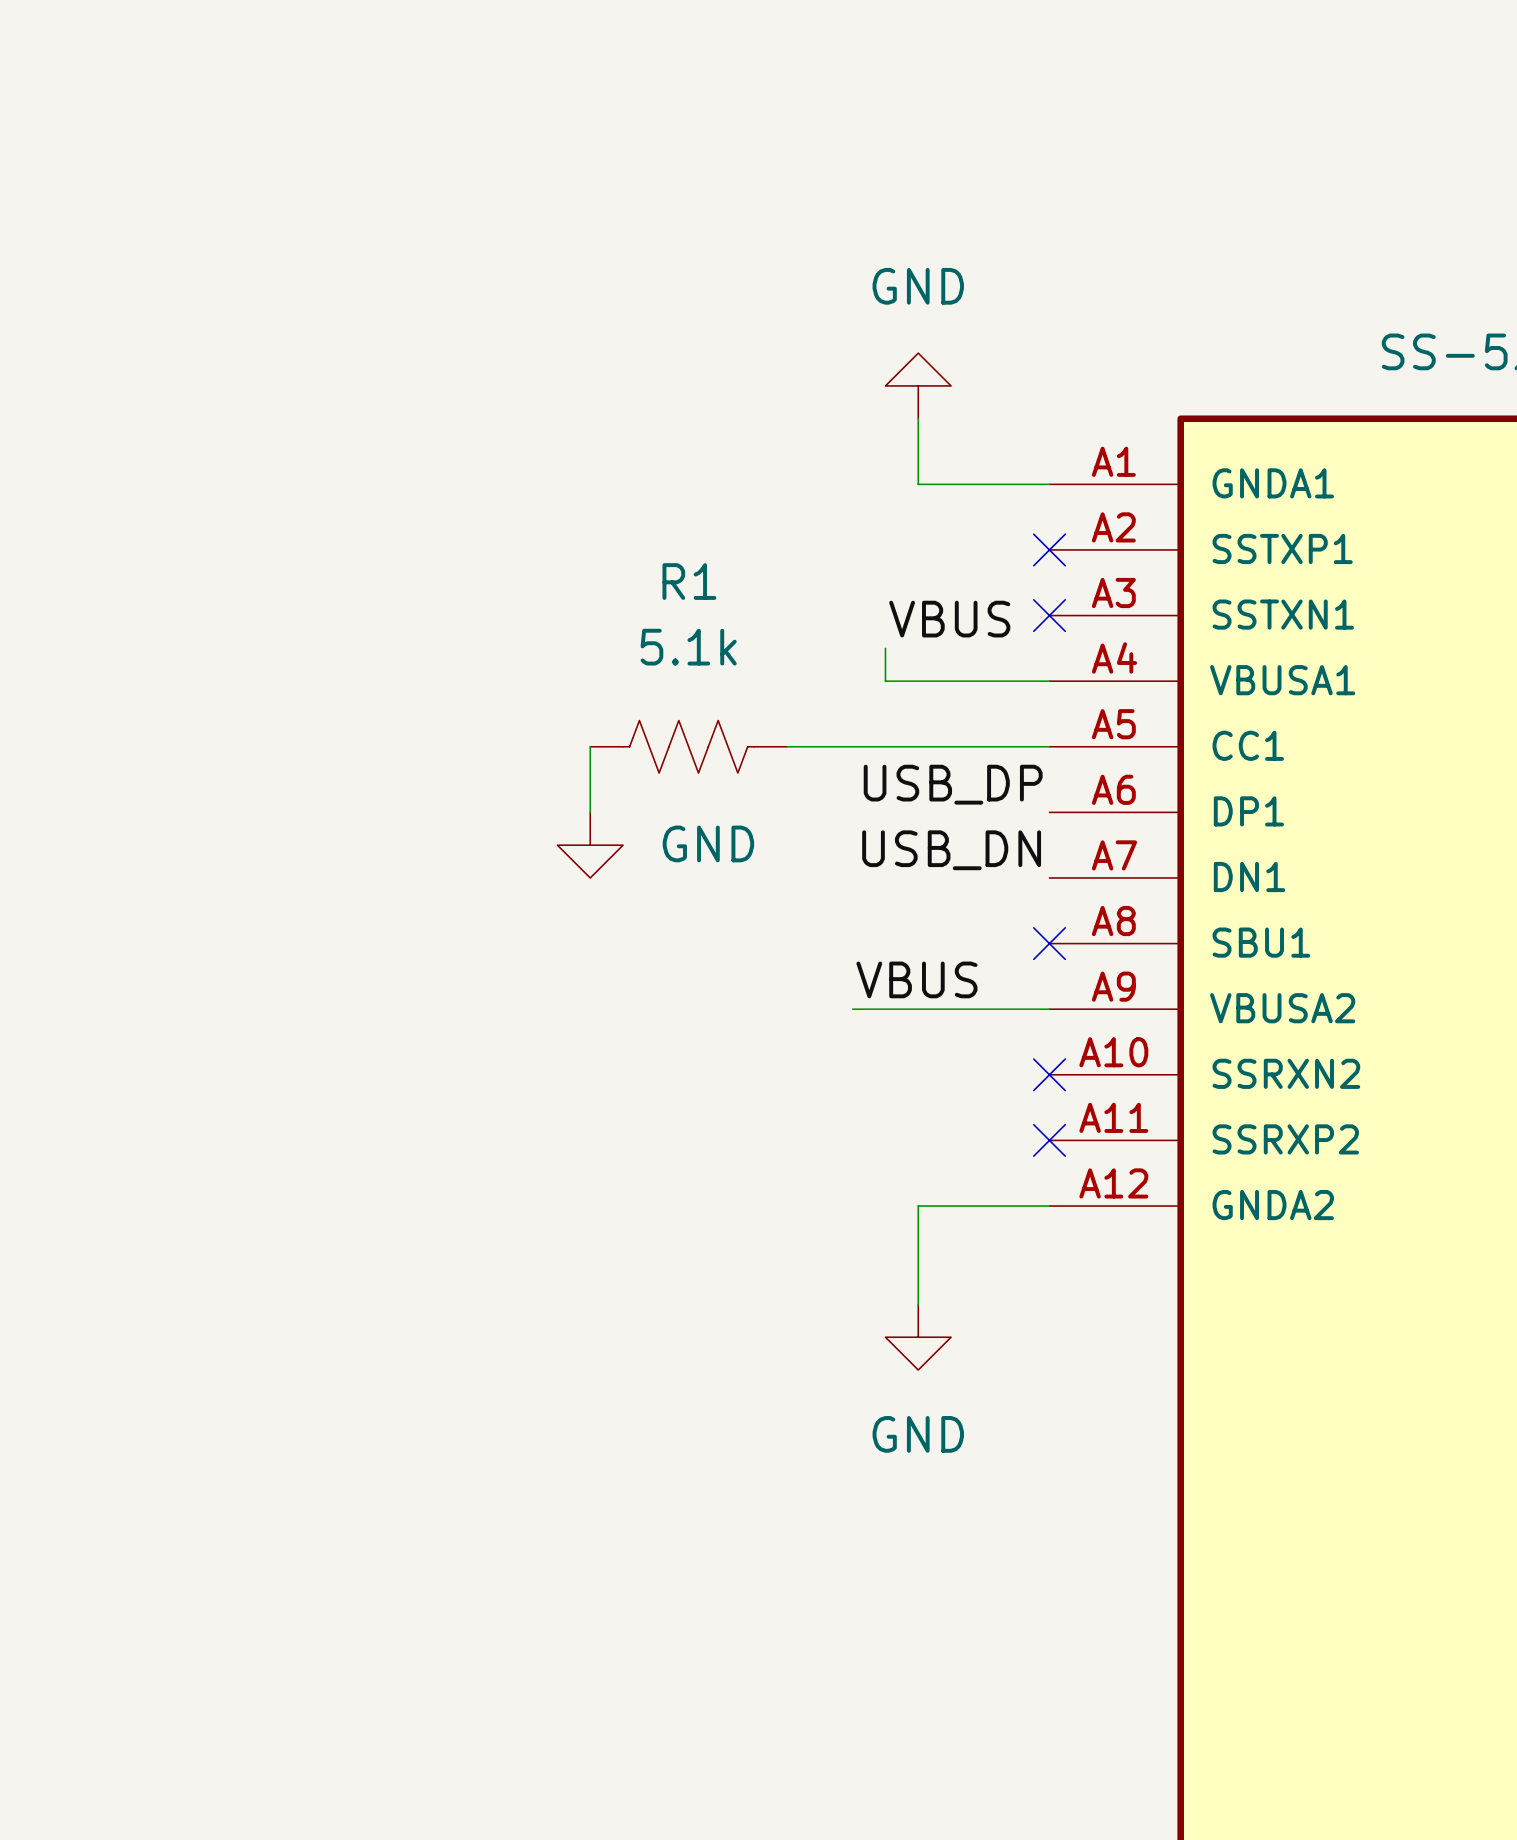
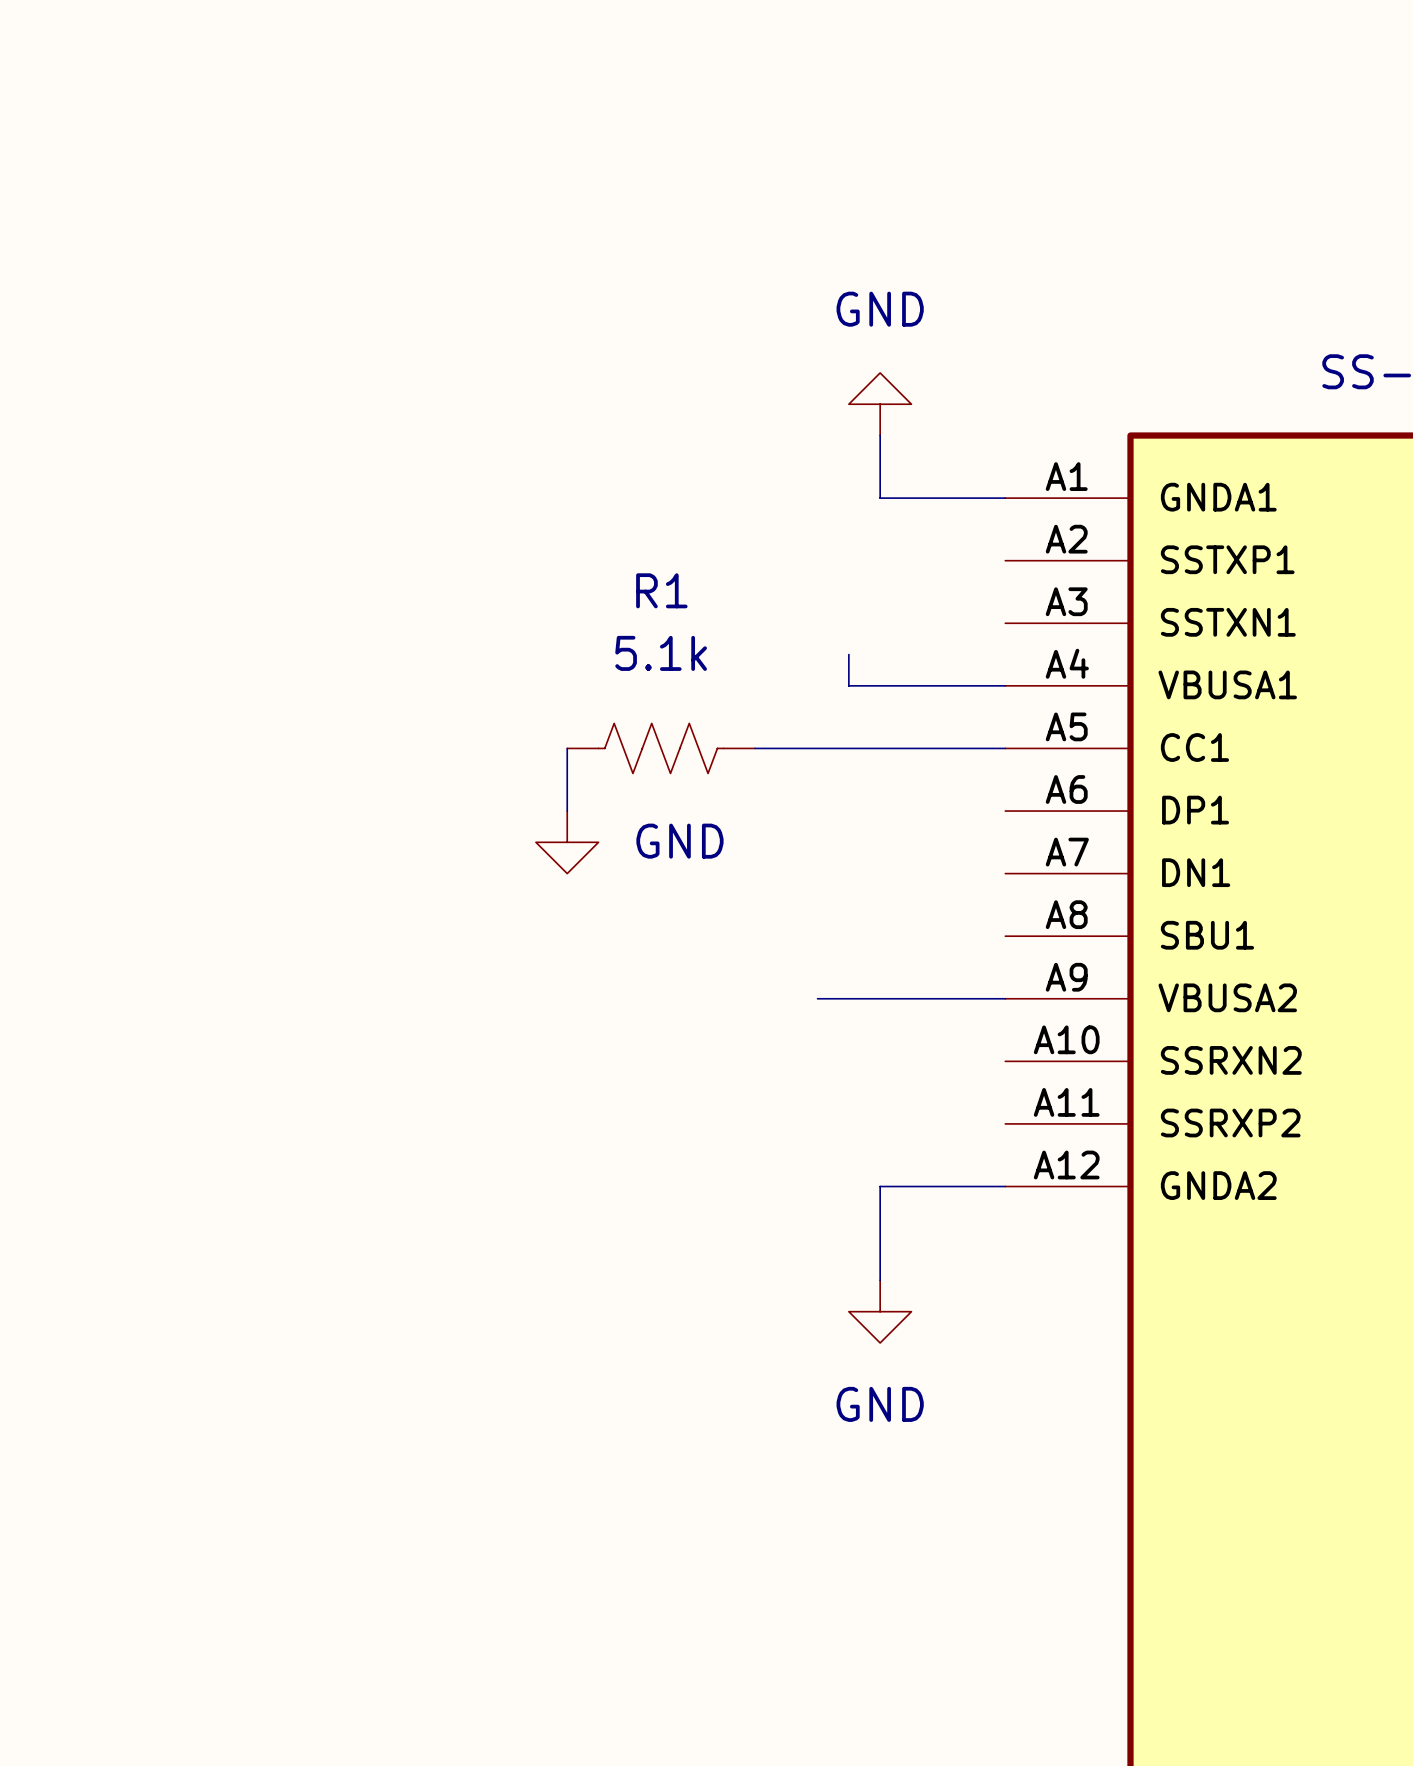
no-connect mark: (1049, 549) -> none
no-connect mark: (1049, 615) -> none
label: VBUS (949, 619) -> none
label: USB_DP (953, 784) -> none
label: USB_DN (951, 850) -> none
no-connect mark: (1049, 943) -> none
label: VBUS (916, 979) -> none
no-connect mark: (1049, 1074) -> none
no-connect mark: (1049, 1140) -> none

